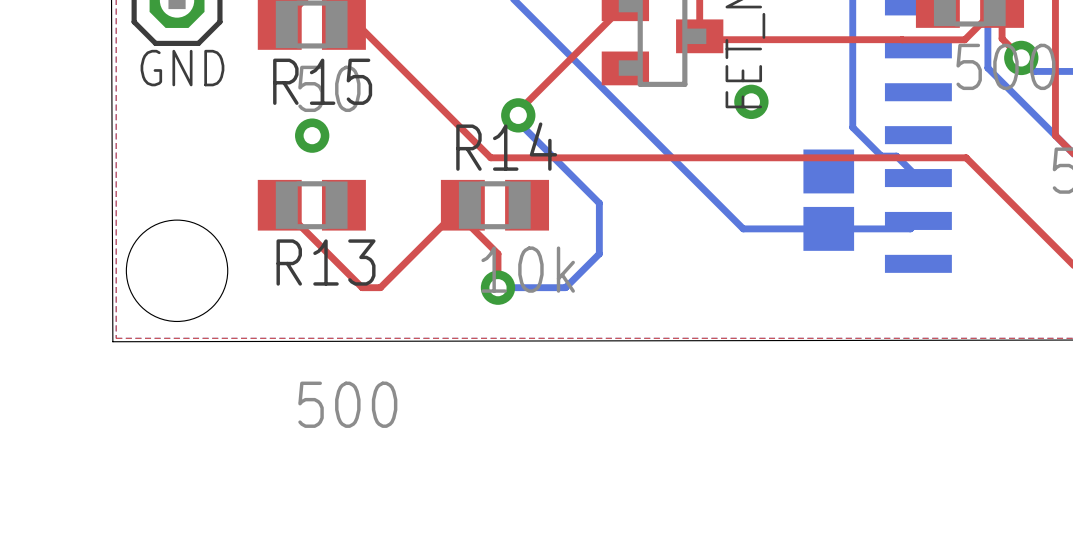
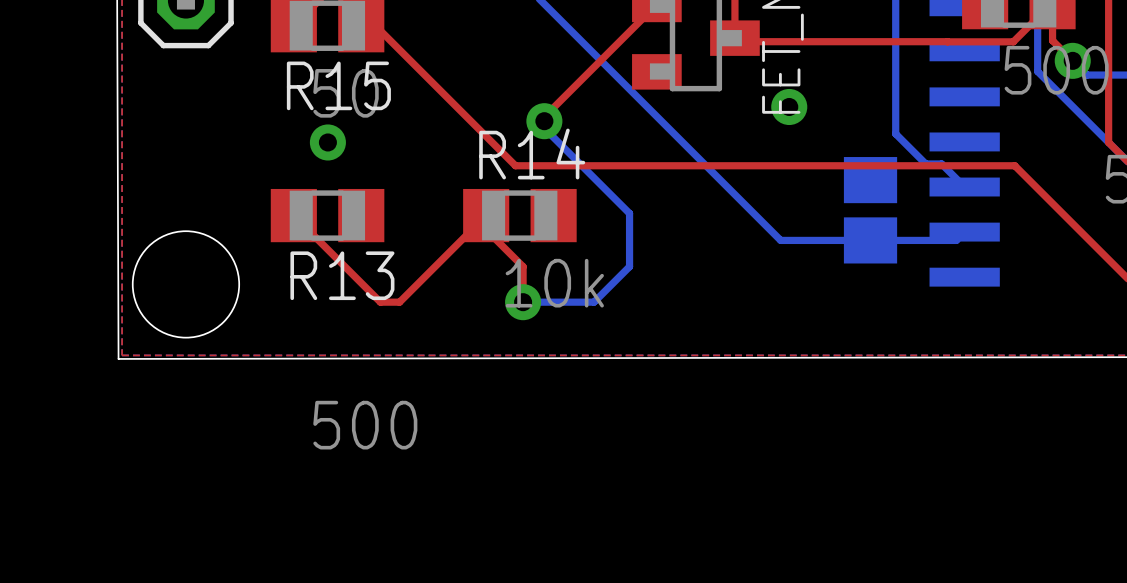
text: GND (182, 68) -> none

